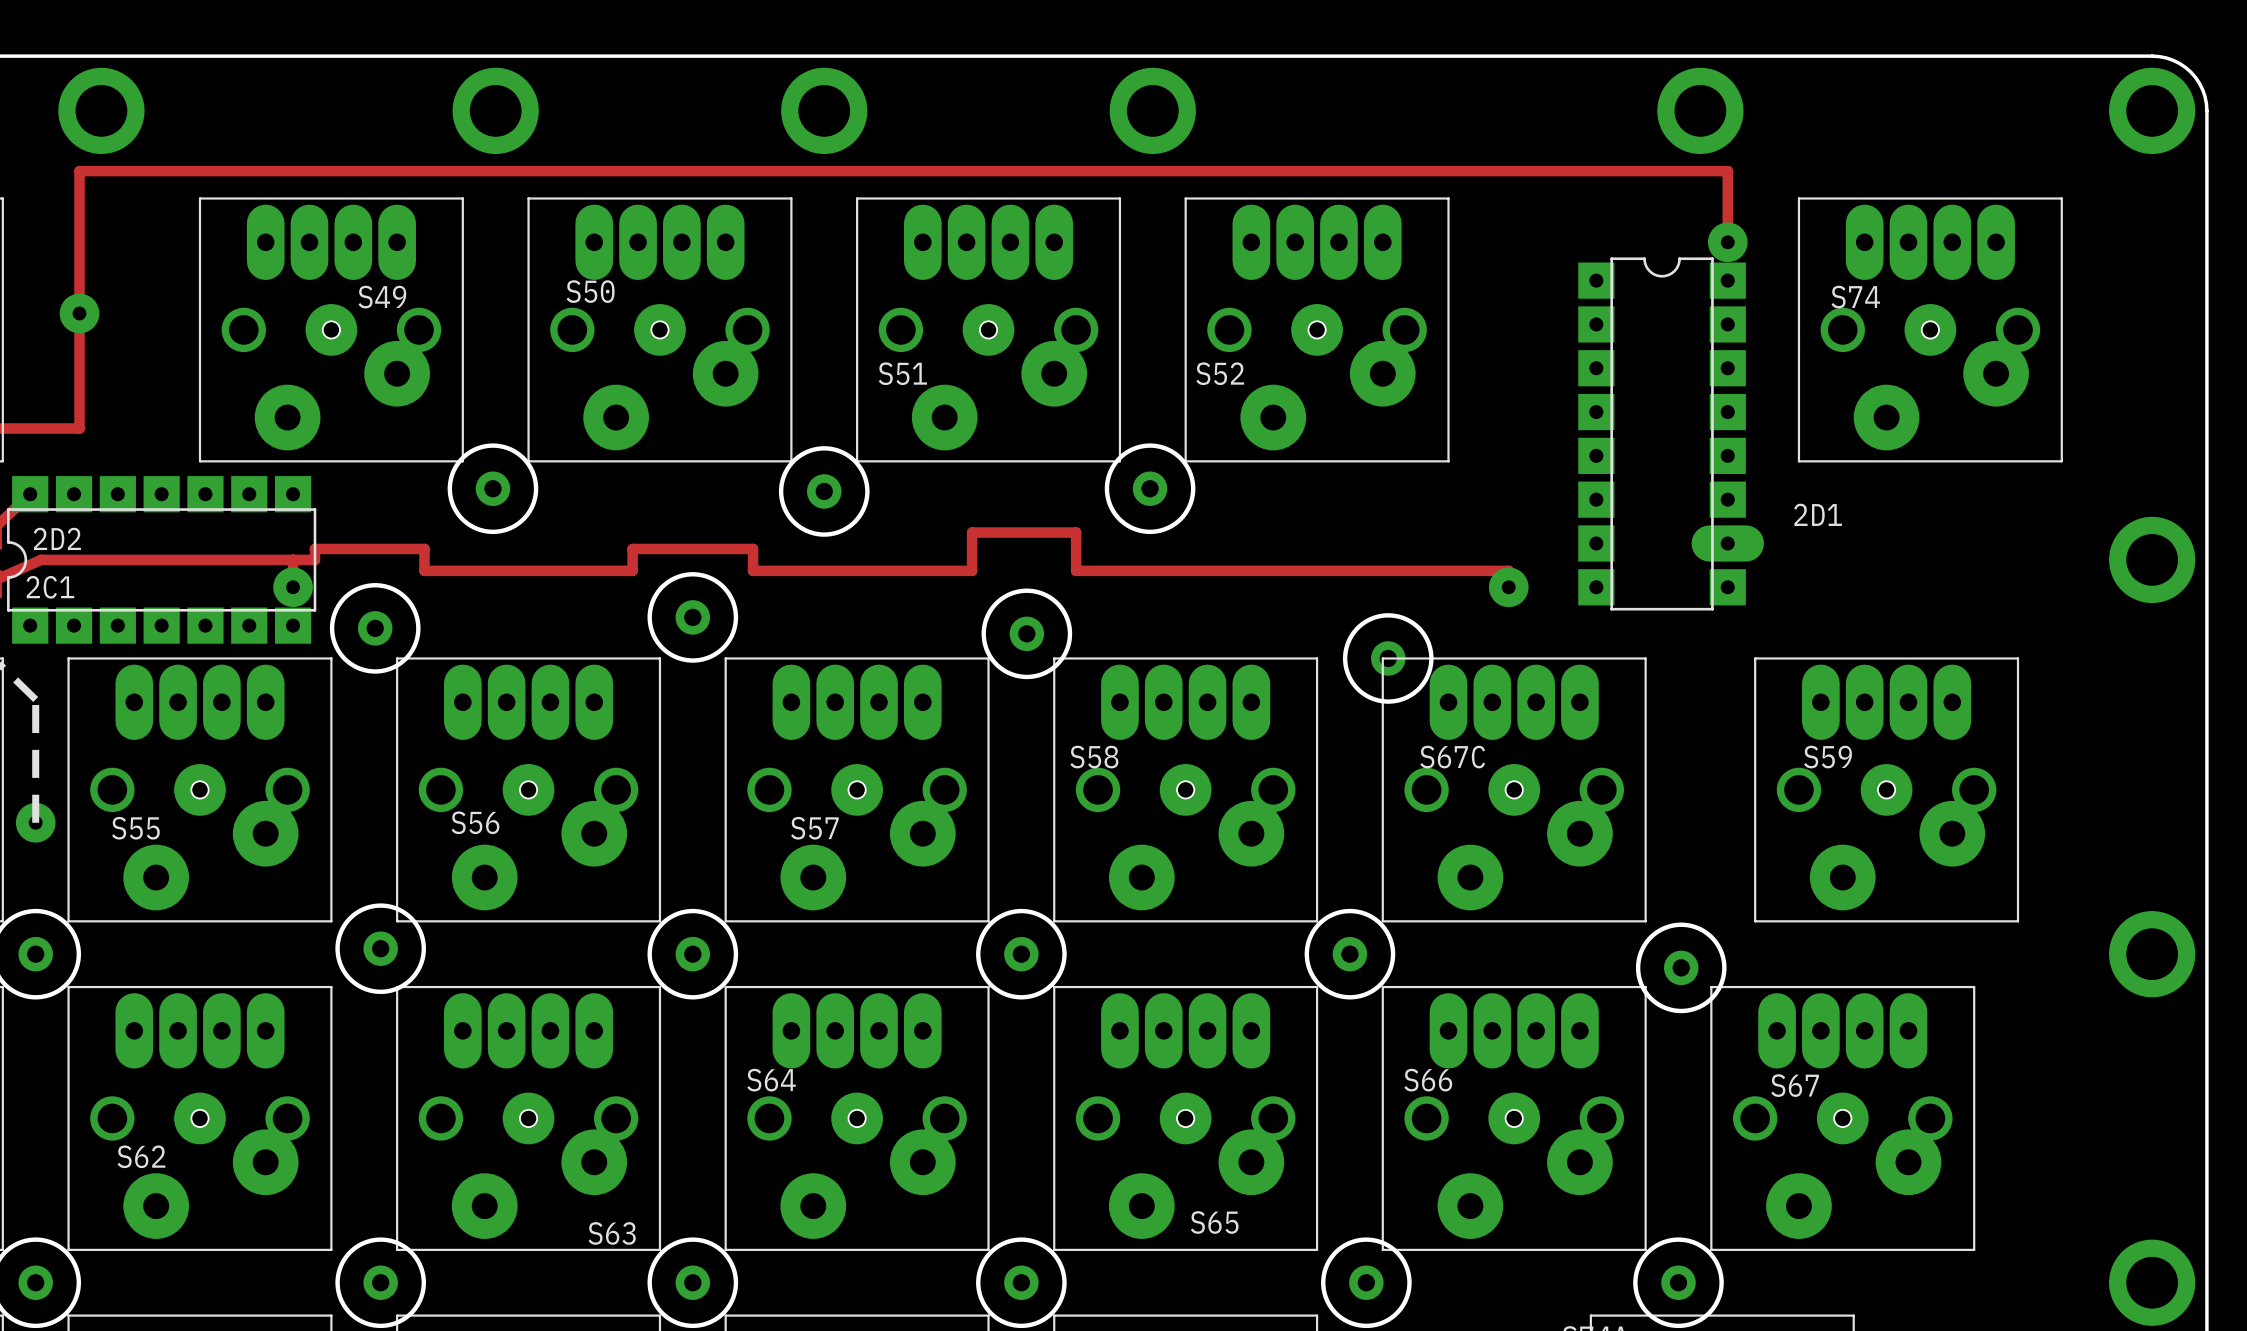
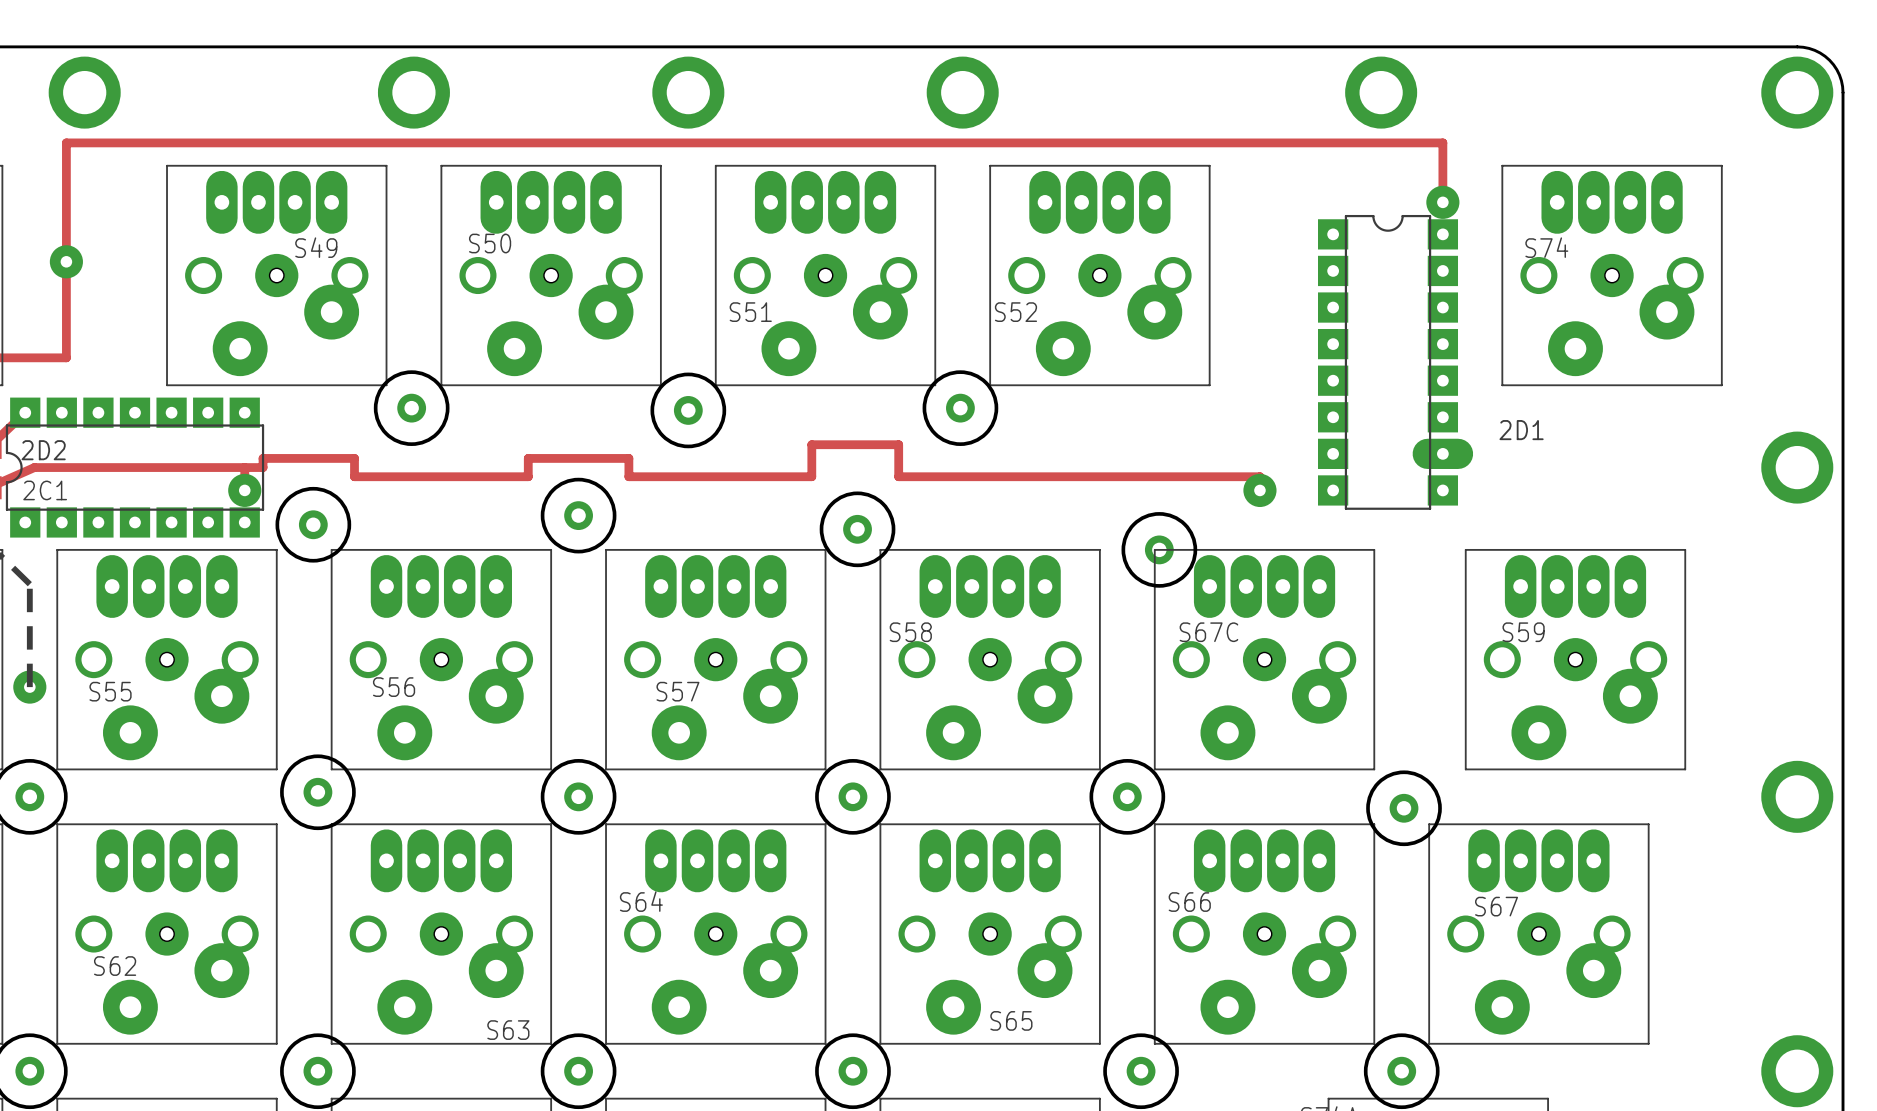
via position: (1700, 110) -> (1381, 92)

